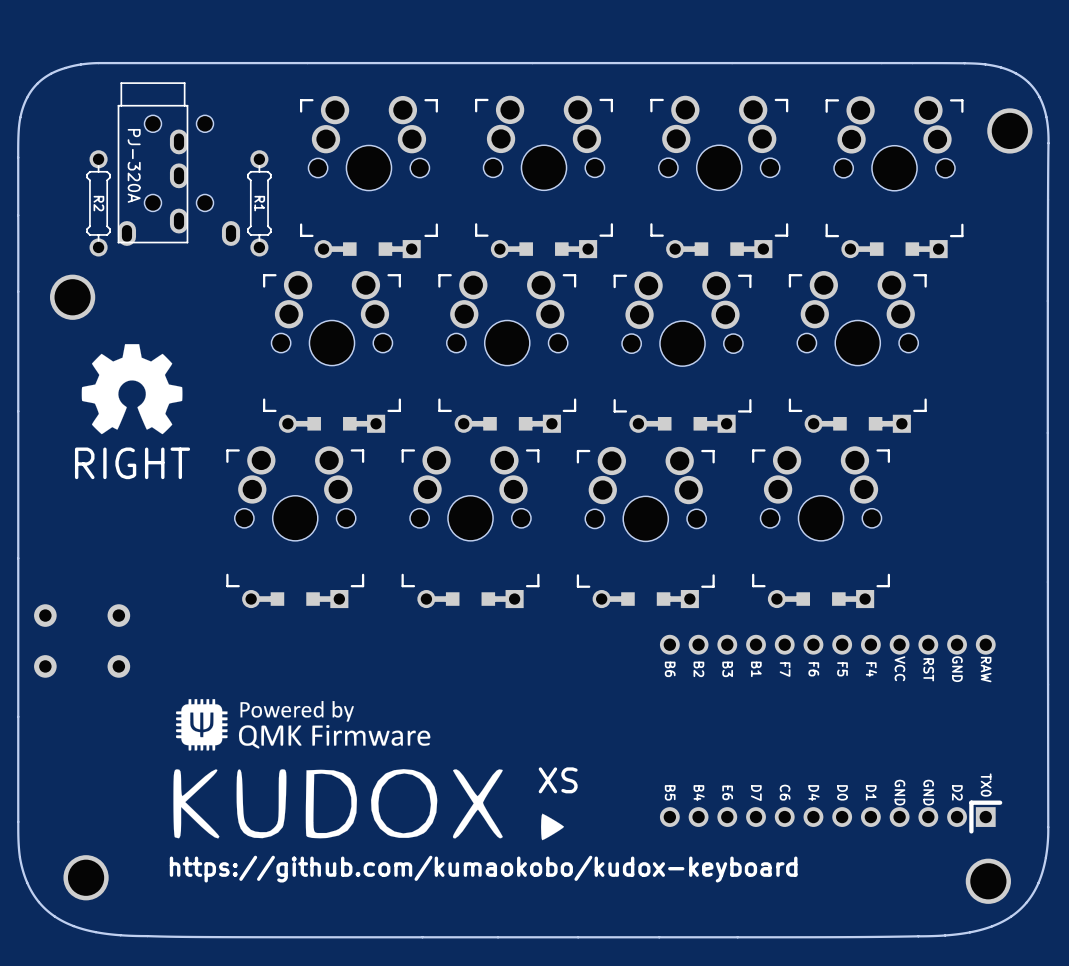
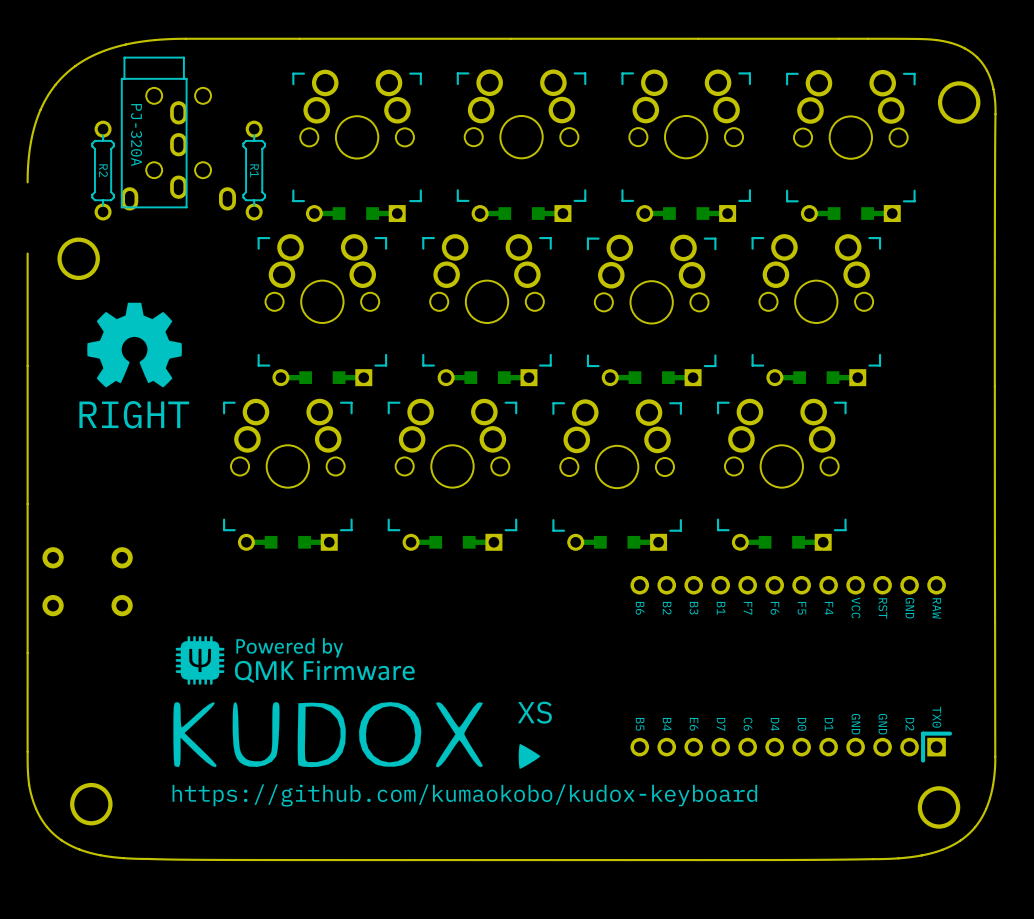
board edge: (307, 63) (92, 63) (62, 68) (42, 79) (26, 98) (19, 125) (18, 291) -> (299, 38) (154, 40) (118, 46) (88, 58) (61, 78) (42, 104) (31, 139) (27, 182)

